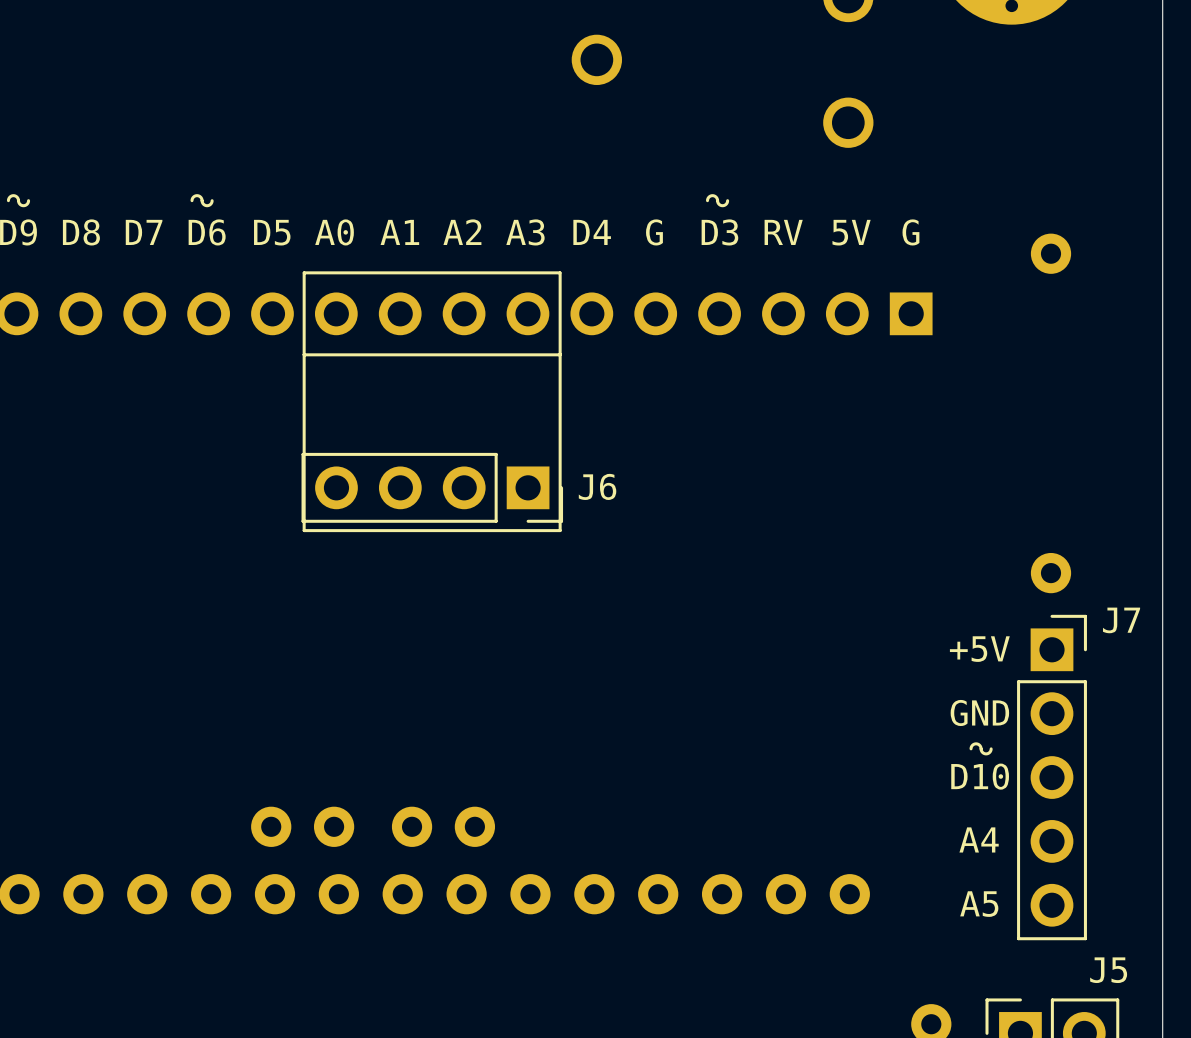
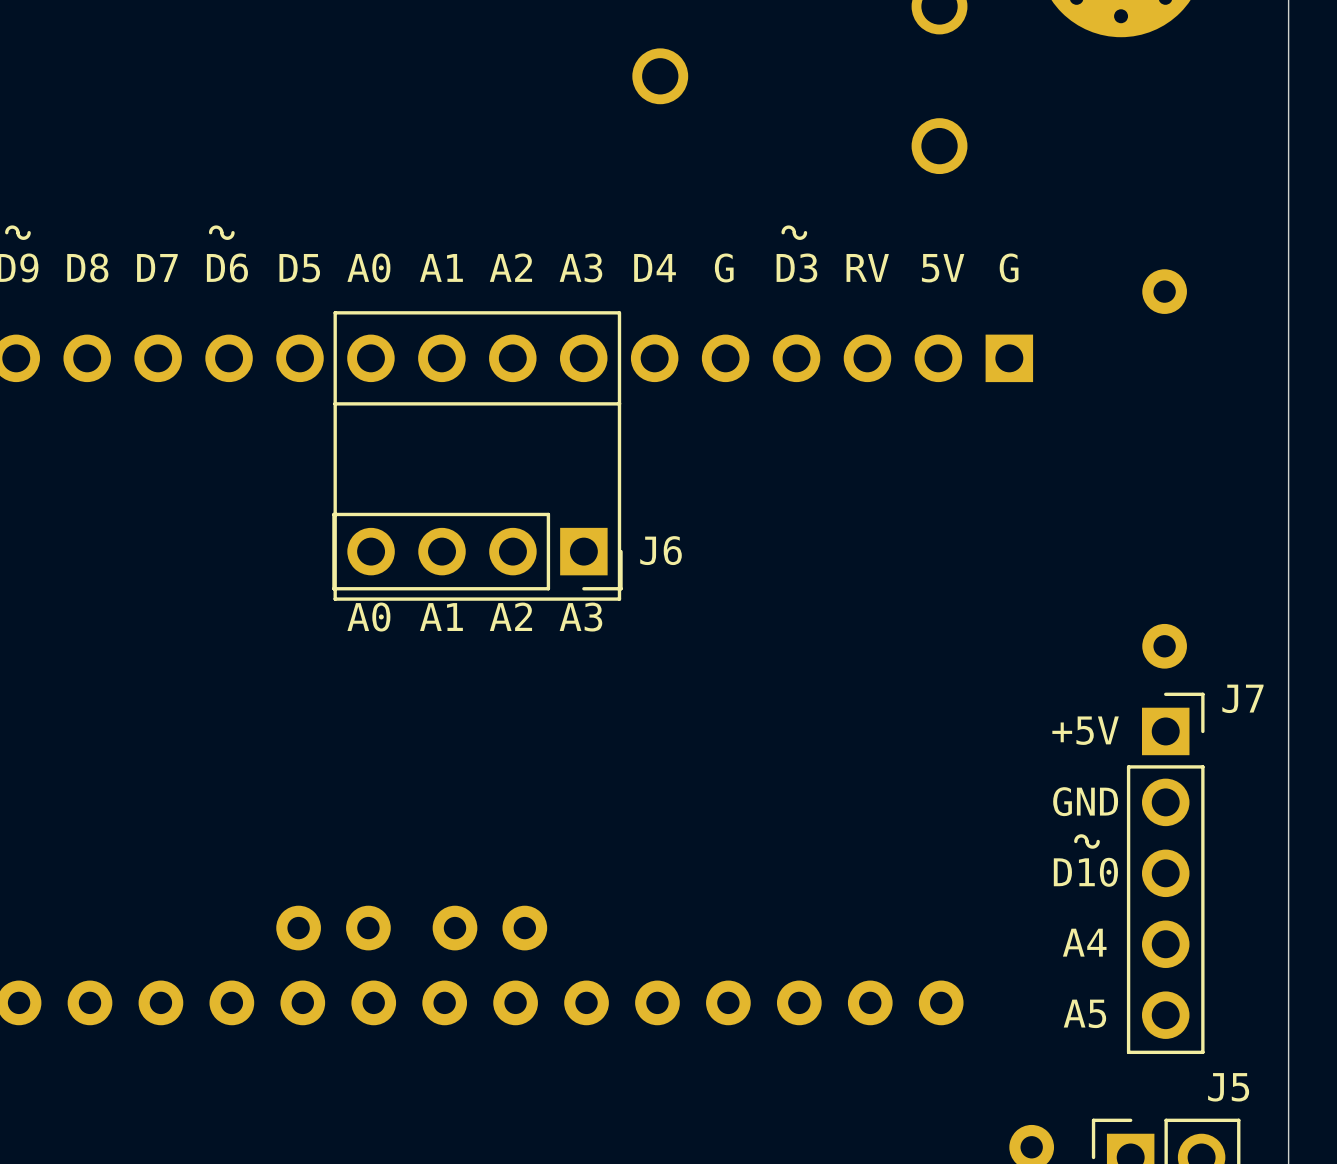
text: none -> A0 (368, 617)
text: none -> A1 (441, 617)
text: none -> A2 (510, 616)
text: none -> A3 (580, 617)

